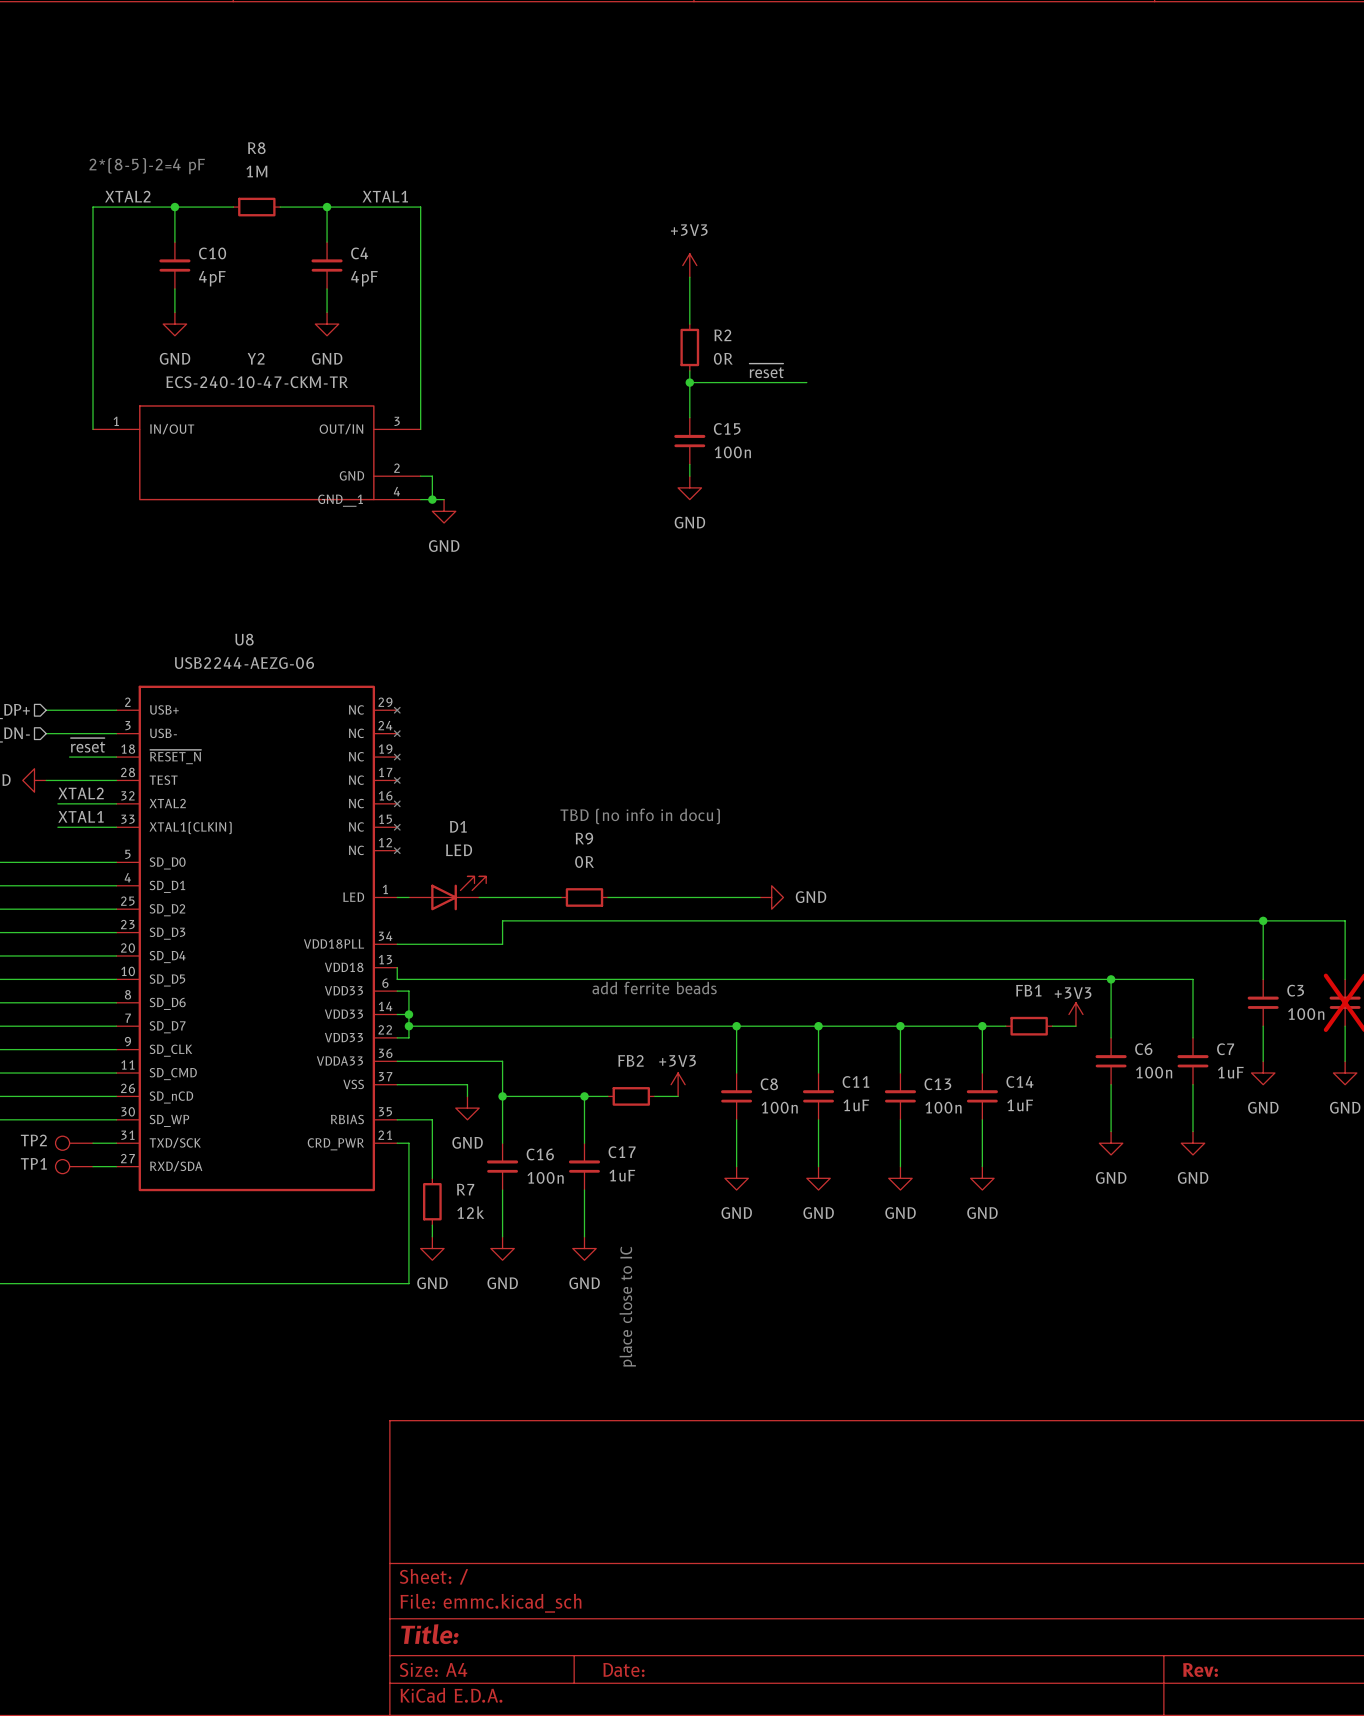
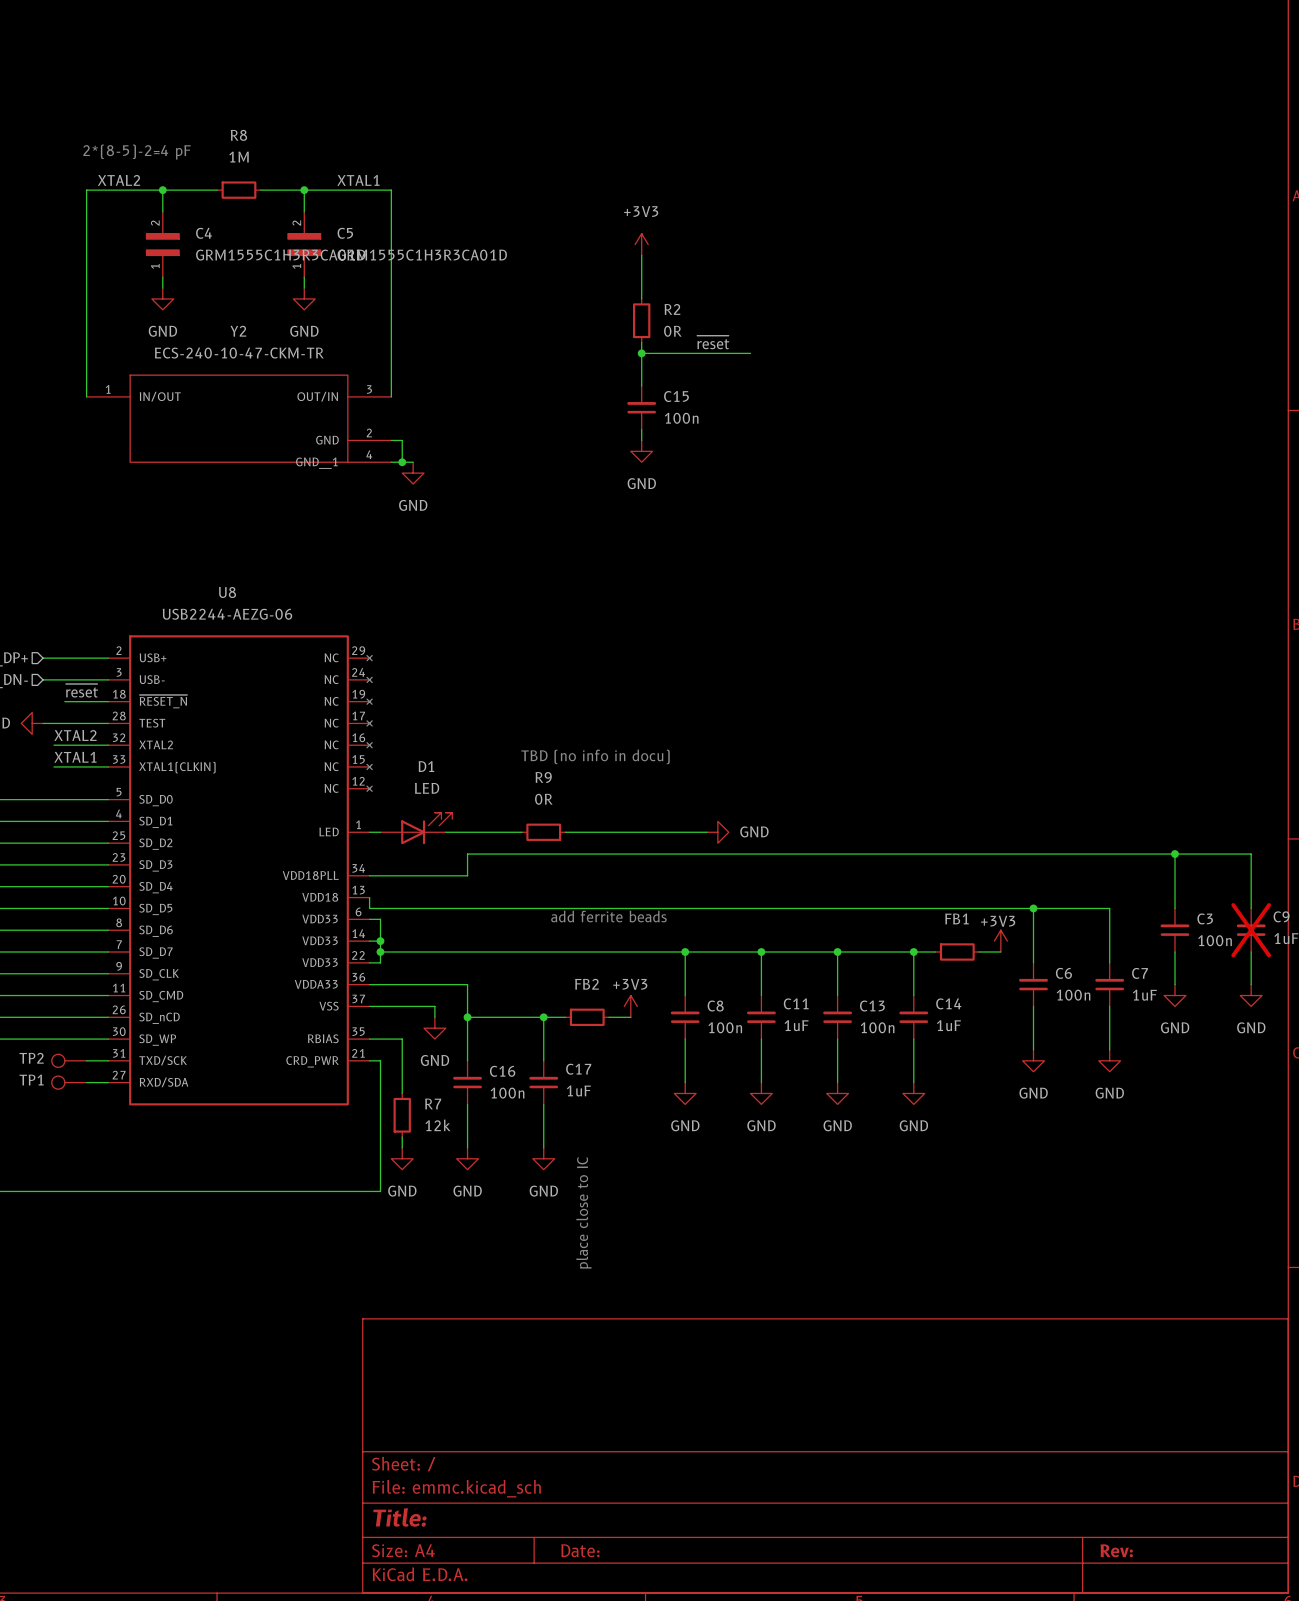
C4 symbol: [311, 242, 343, 289] -> [146, 211, 180, 278]
C10: (174, 265) -> none
C5: none -> GRM1555C1H3R3CA01D (304, 244)
C4 value: none -> GRM1555C1H3R3CA01D (280, 255)
C4 text: 4pF (364, 278) -> none

